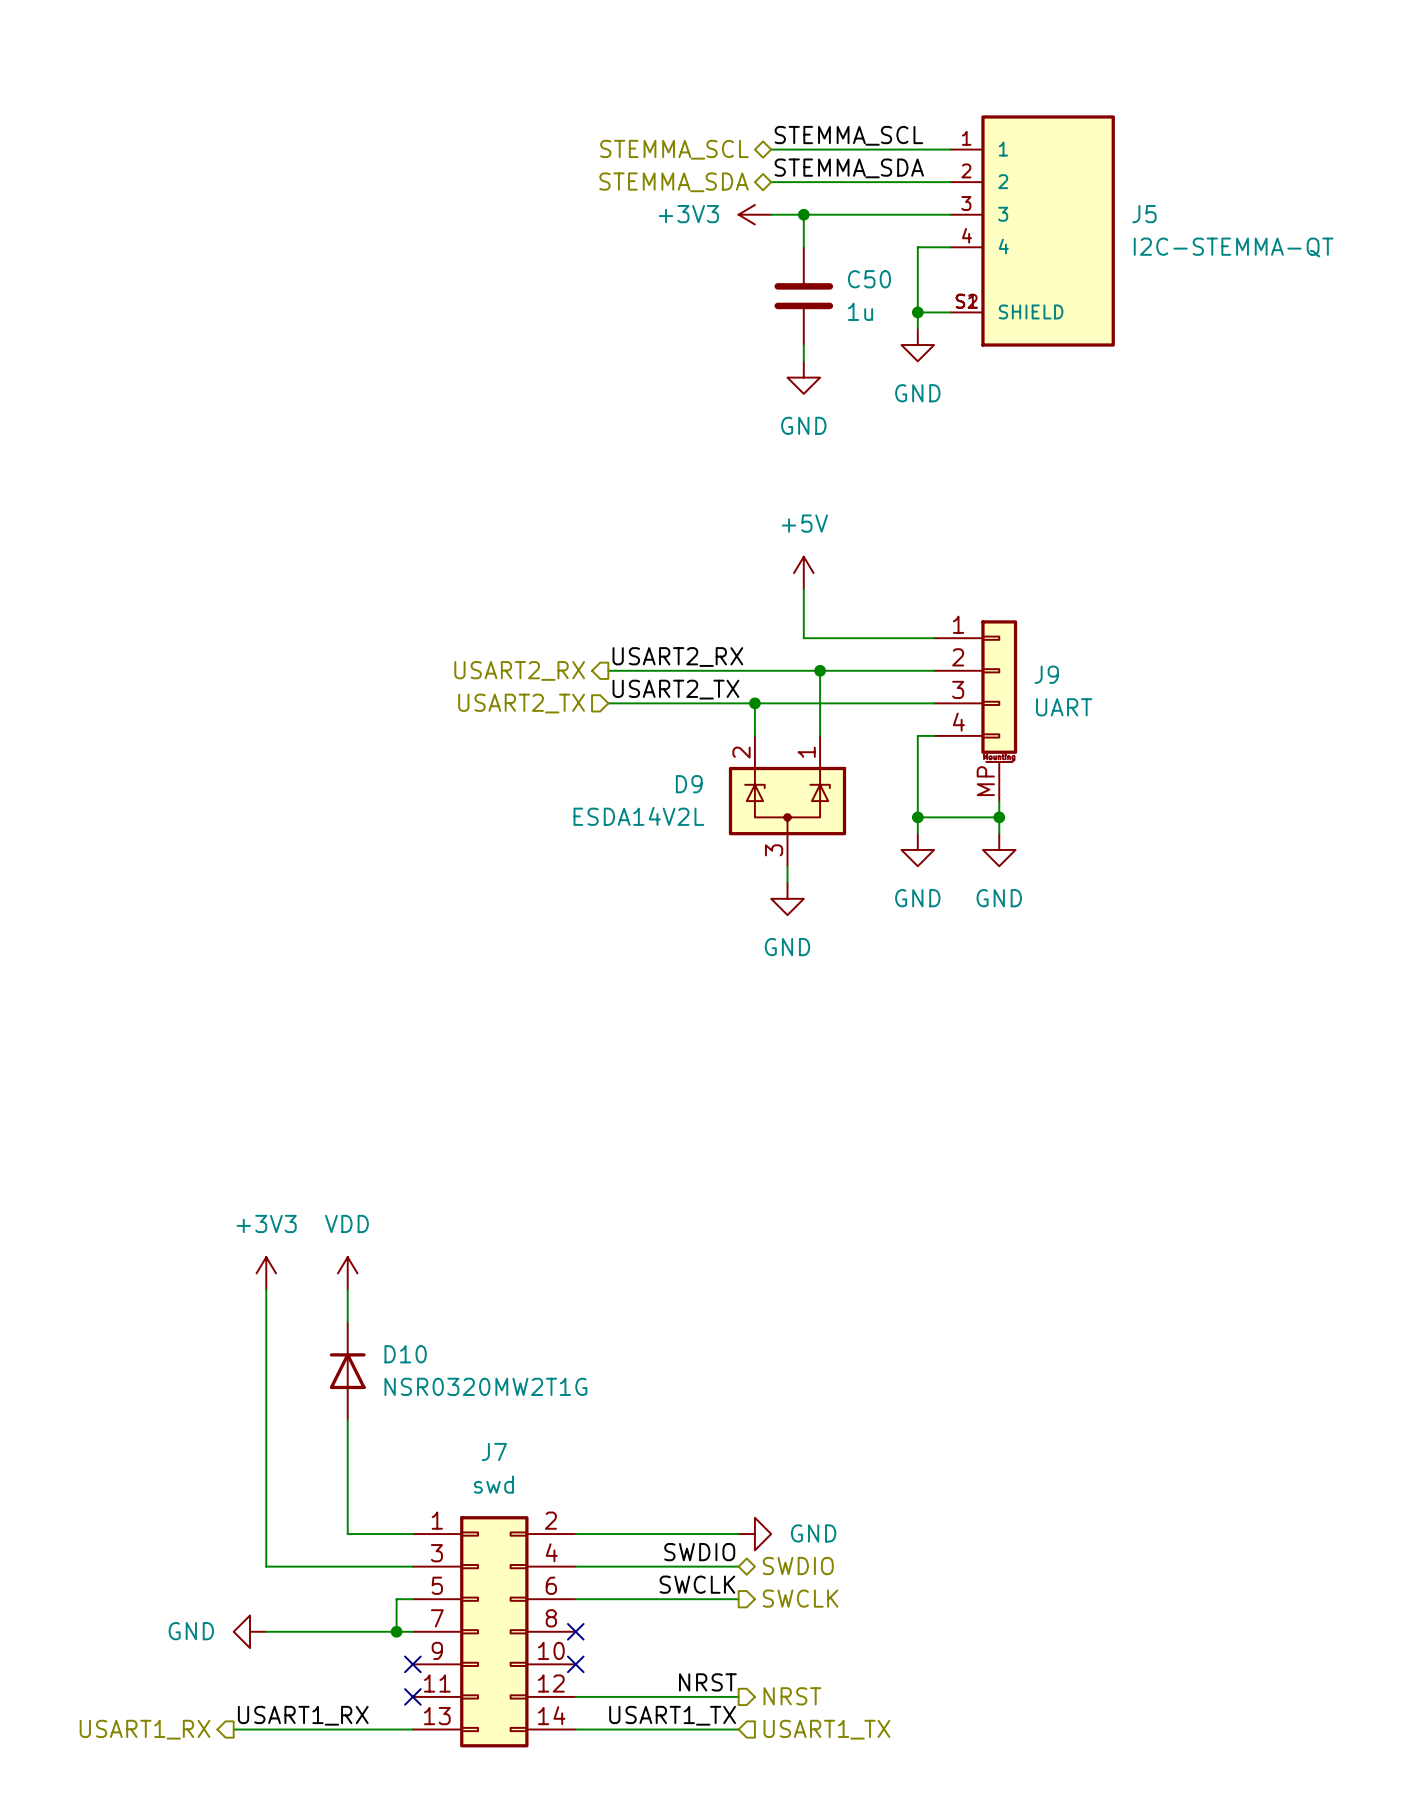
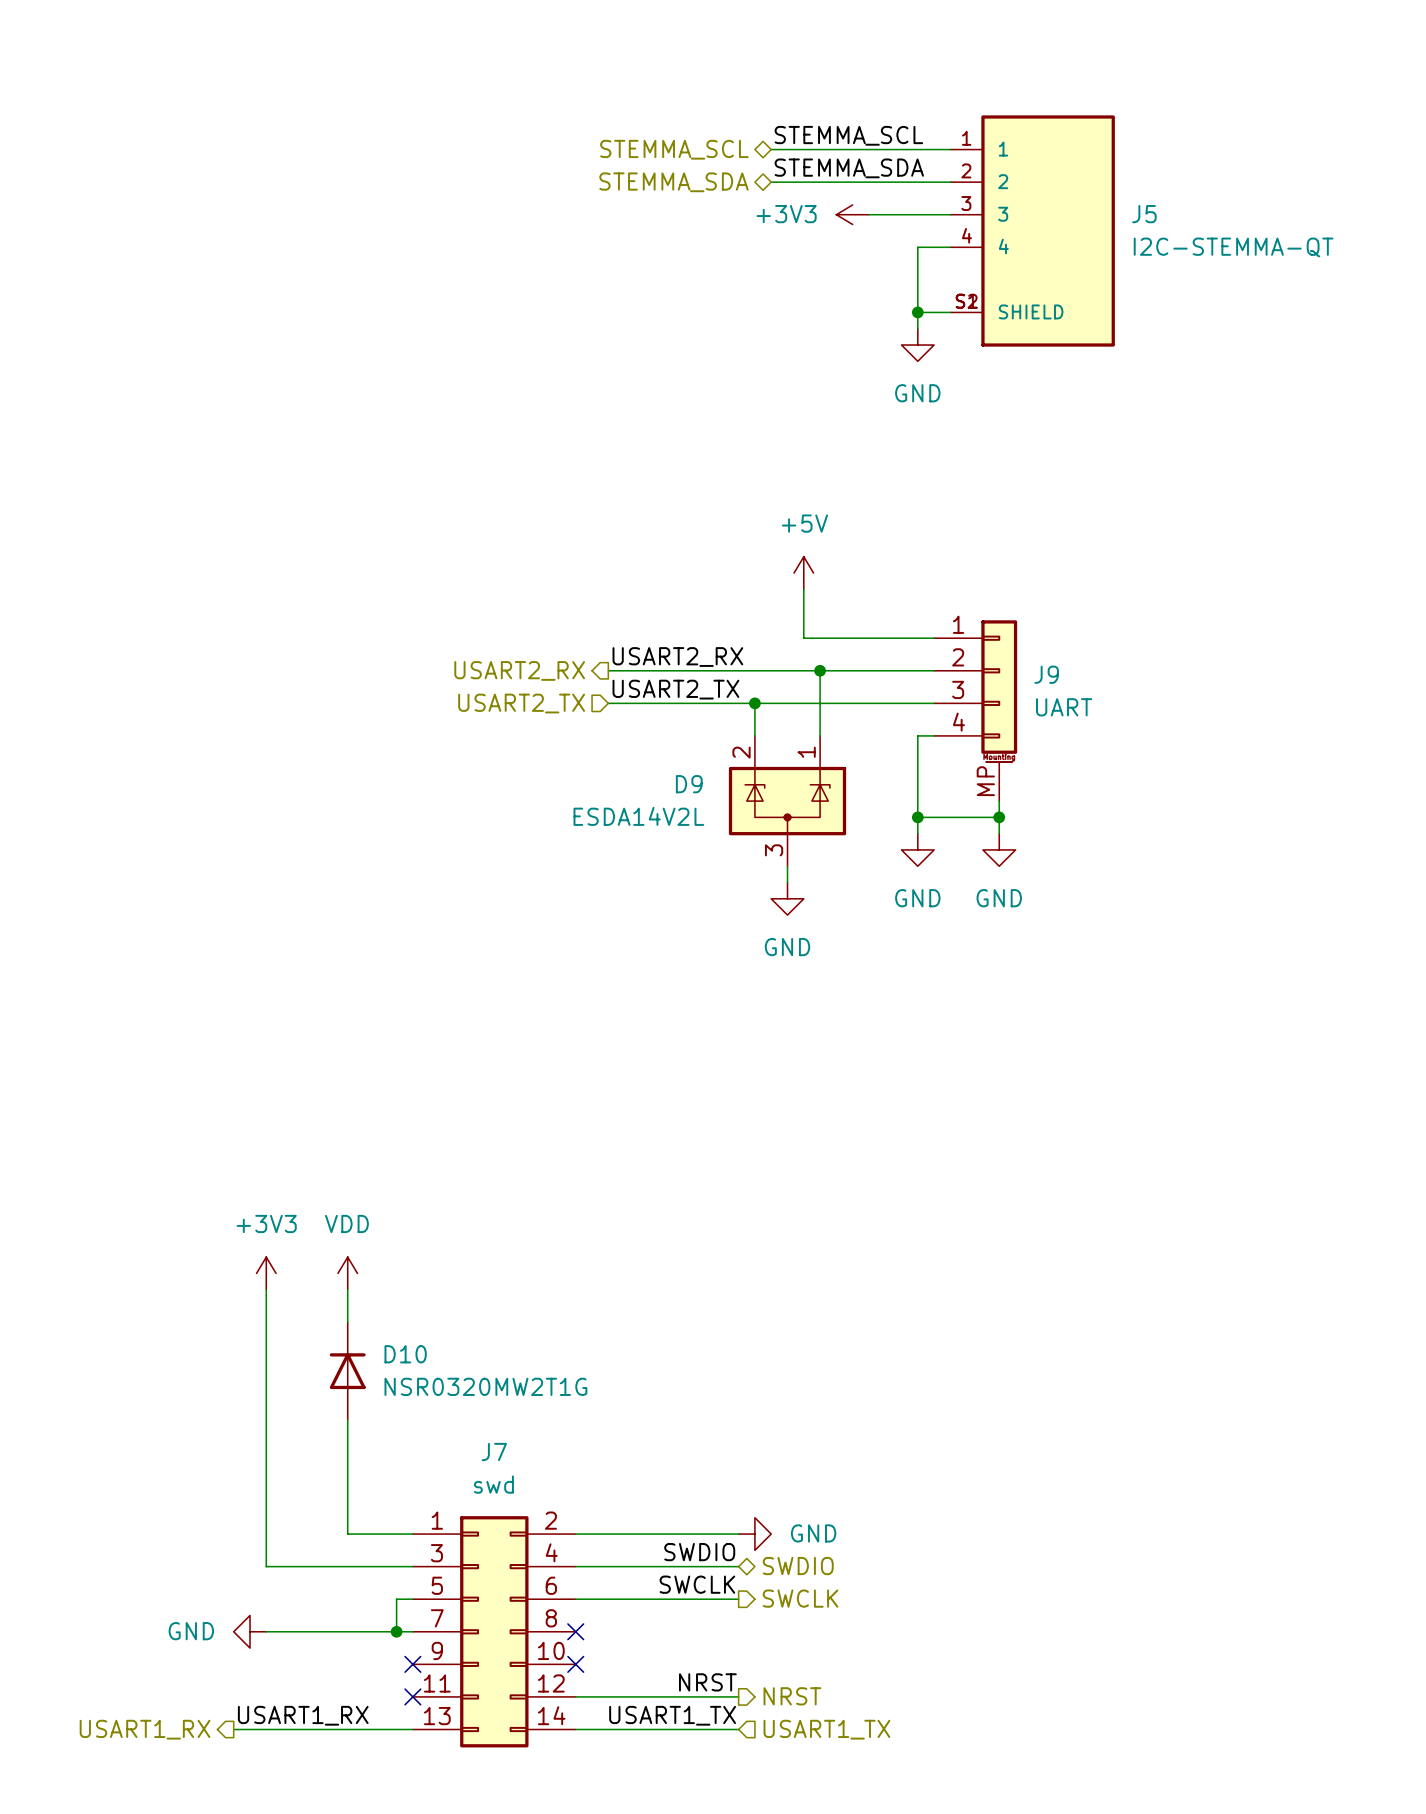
power symbol position: +3V3 (754, 214) -> +3V3 (852, 214)
wire: (771, 214) (868, 214) -> none
wire: (803, 214) (803, 247) -> none
junction: (803, 214) -> none
C50: 1u (803, 296) -> none
wire: (803, 345) (803, 361) -> none
power symbol: GND (803, 377) -> none

